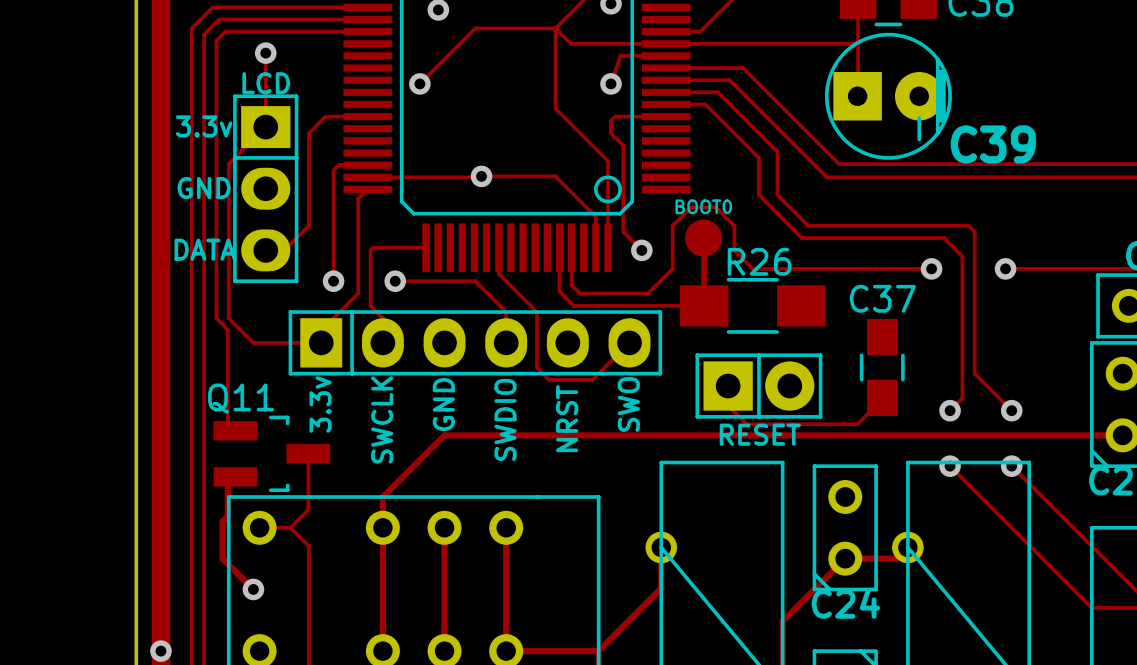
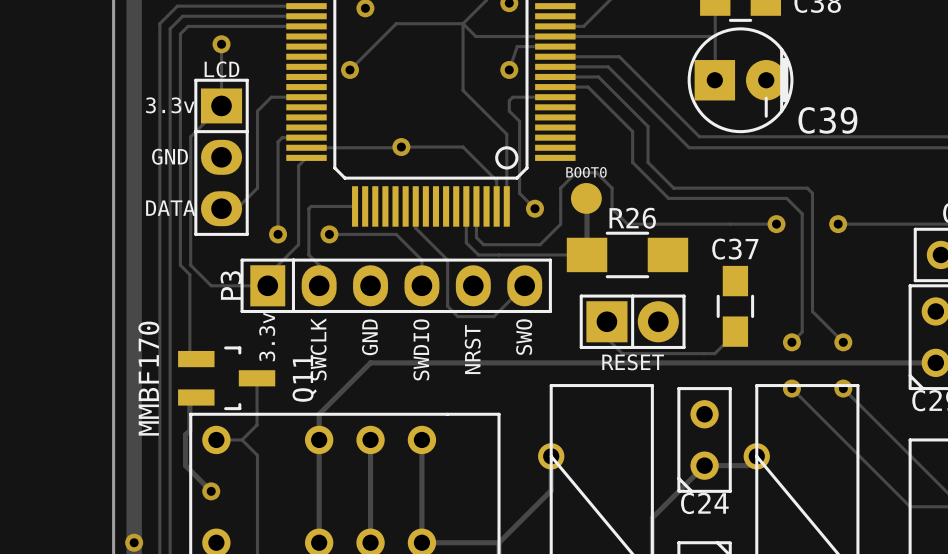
P3 name: none -> P3 (231, 285)
Q11 name rotation: 0° (241, 398) -> 90° counterclockwise (304, 378)
Q11 name position: Q11 (241, 398) -> Q11 (304, 378)
Q11 value: none -> MMBF170 (148, 378)

